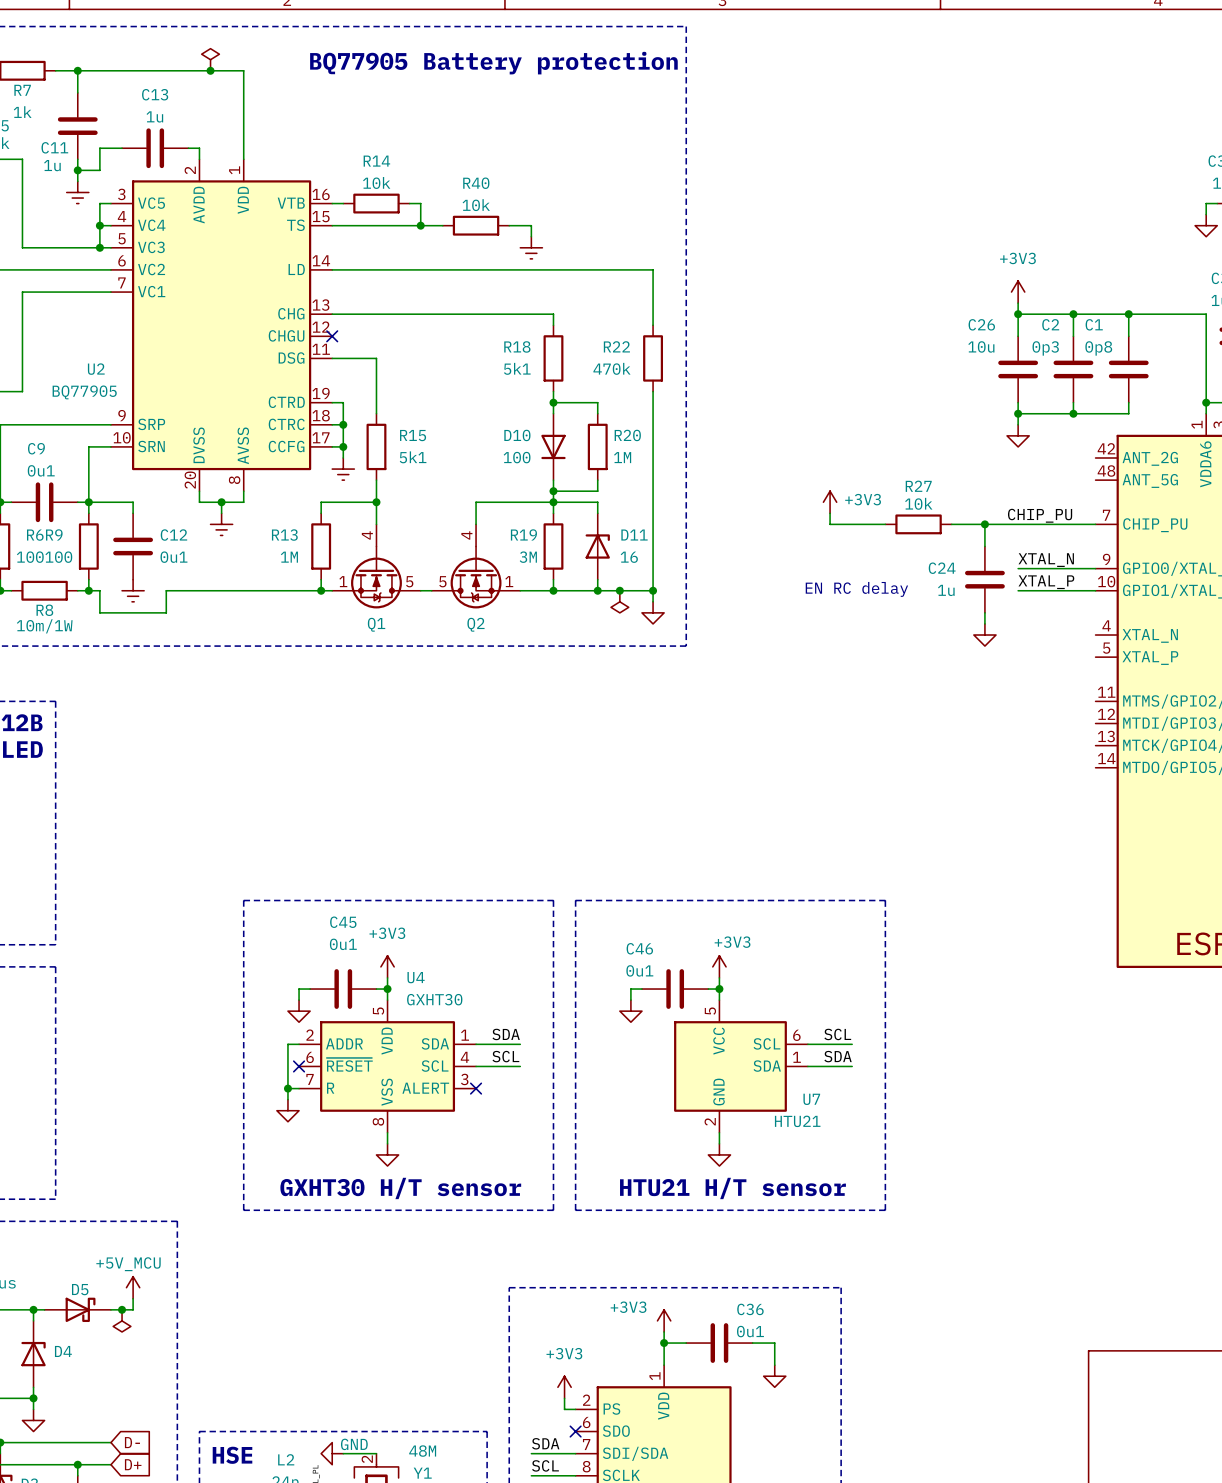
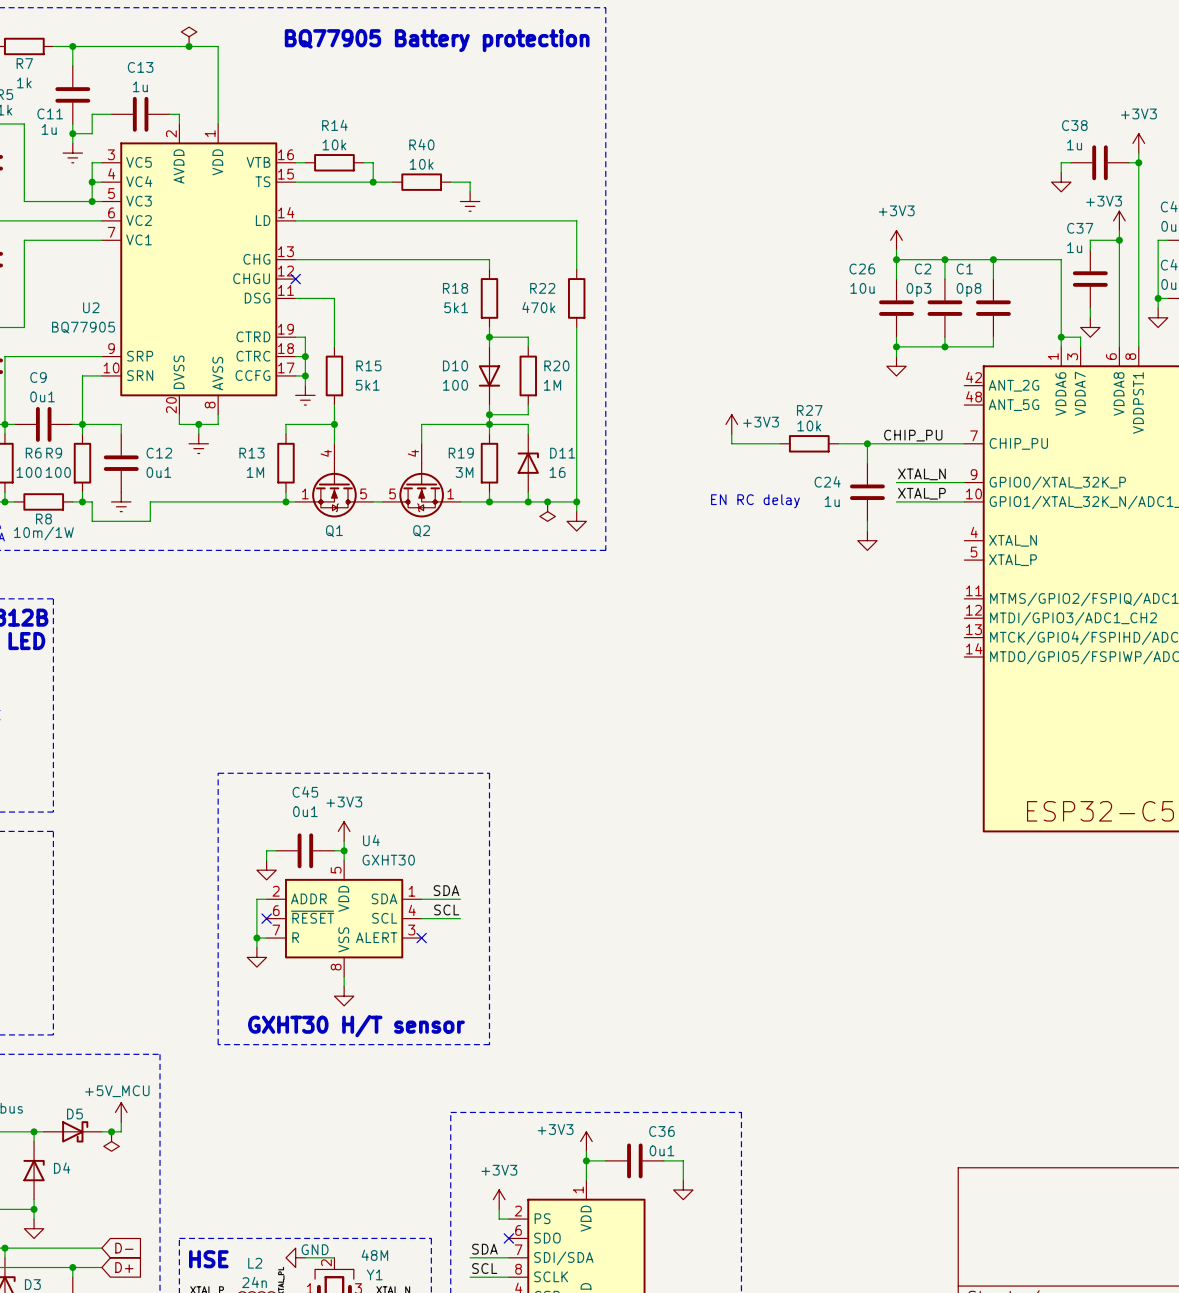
line: (575, 900) (885, 900) (885, 1210) (575, 1210) (575, 900) -> none
power symbol: +3V3 (719, 966) -> none
wire: (719, 977) (719, 1000) -> none
wire: (641, 989) (630, 989) (630, 1000) -> none
C46: 0u1 (675, 989) -> none
wire: (708, 989) (719, 989) -> none
junction: (719, 989) -> none
power symbol: (630, 1011) -> none
label: SCL (837, 1034) -> none
wire: (807, 1044) (852, 1044) -> none
label: SDA (838, 1056) -> none
U7: HTU21 (741, 1066) -> none
wire: (807, 1066) (852, 1066) -> none
wire: (719, 1132) (719, 1143) -> none
power symbol: (719, 1154) -> none
text: HTU21 H/T sensor (732, 1188) -> none

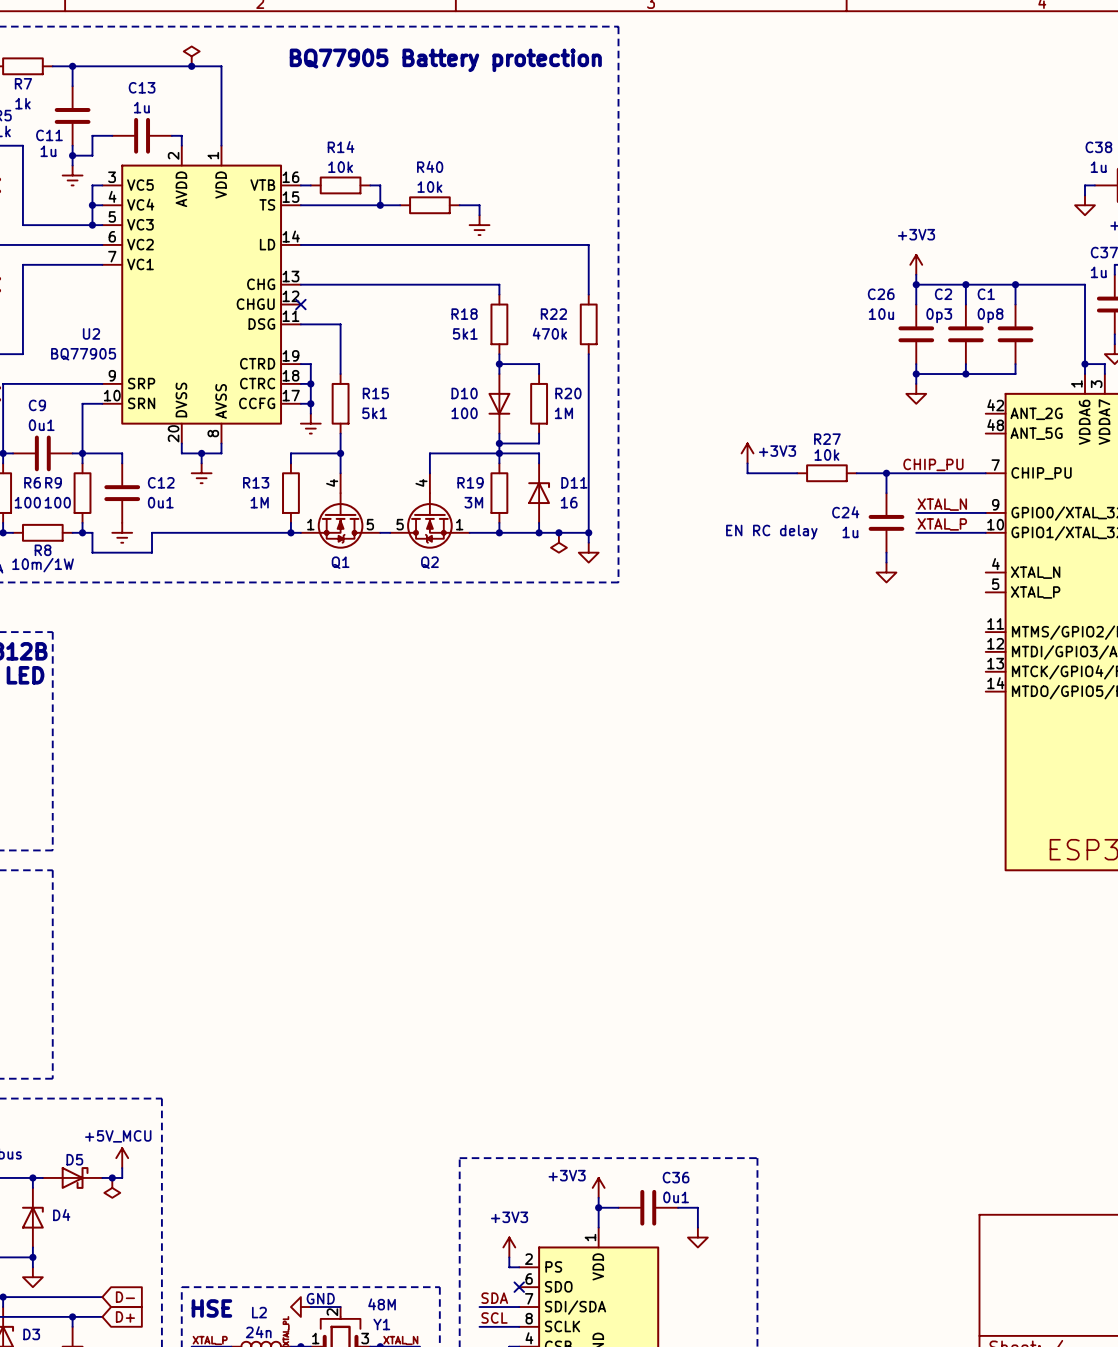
line: (218, 773) (489, 773) (489, 1044) (218, 1044) (218, 773) -> none
power symbol: +3V3 (344, 831) -> none
wire: (344, 841) (344, 860) -> none
wire: (276, 850) (266, 850) (266, 860) -> none
C45: 0u1 (305, 850) -> none
wire: (334, 850) (344, 850) -> none
junction: (344, 850) -> none
power symbol: (266, 870) -> none
label: SDA (446, 890) -> none
wire: (266, 899) (256, 899) (256, 947) -> none
wire: (421, 899) (460, 899) -> none
label: SCL (446, 909) -> none
no-connect mark: (266, 918) -> none
U4: GXHT30 (344, 918) -> none
wire: (421, 918) (460, 918) -> none
wire: (256, 938) (266, 938) -> none
junction: (256, 938) -> none
no-connect mark: (421, 938) -> none
power symbol: (256, 957) -> none
wire: (344, 976) (344, 986) -> none
power symbol: (344, 996) -> none
text: GXHT30 H/T sensor (356, 1026) -> none

